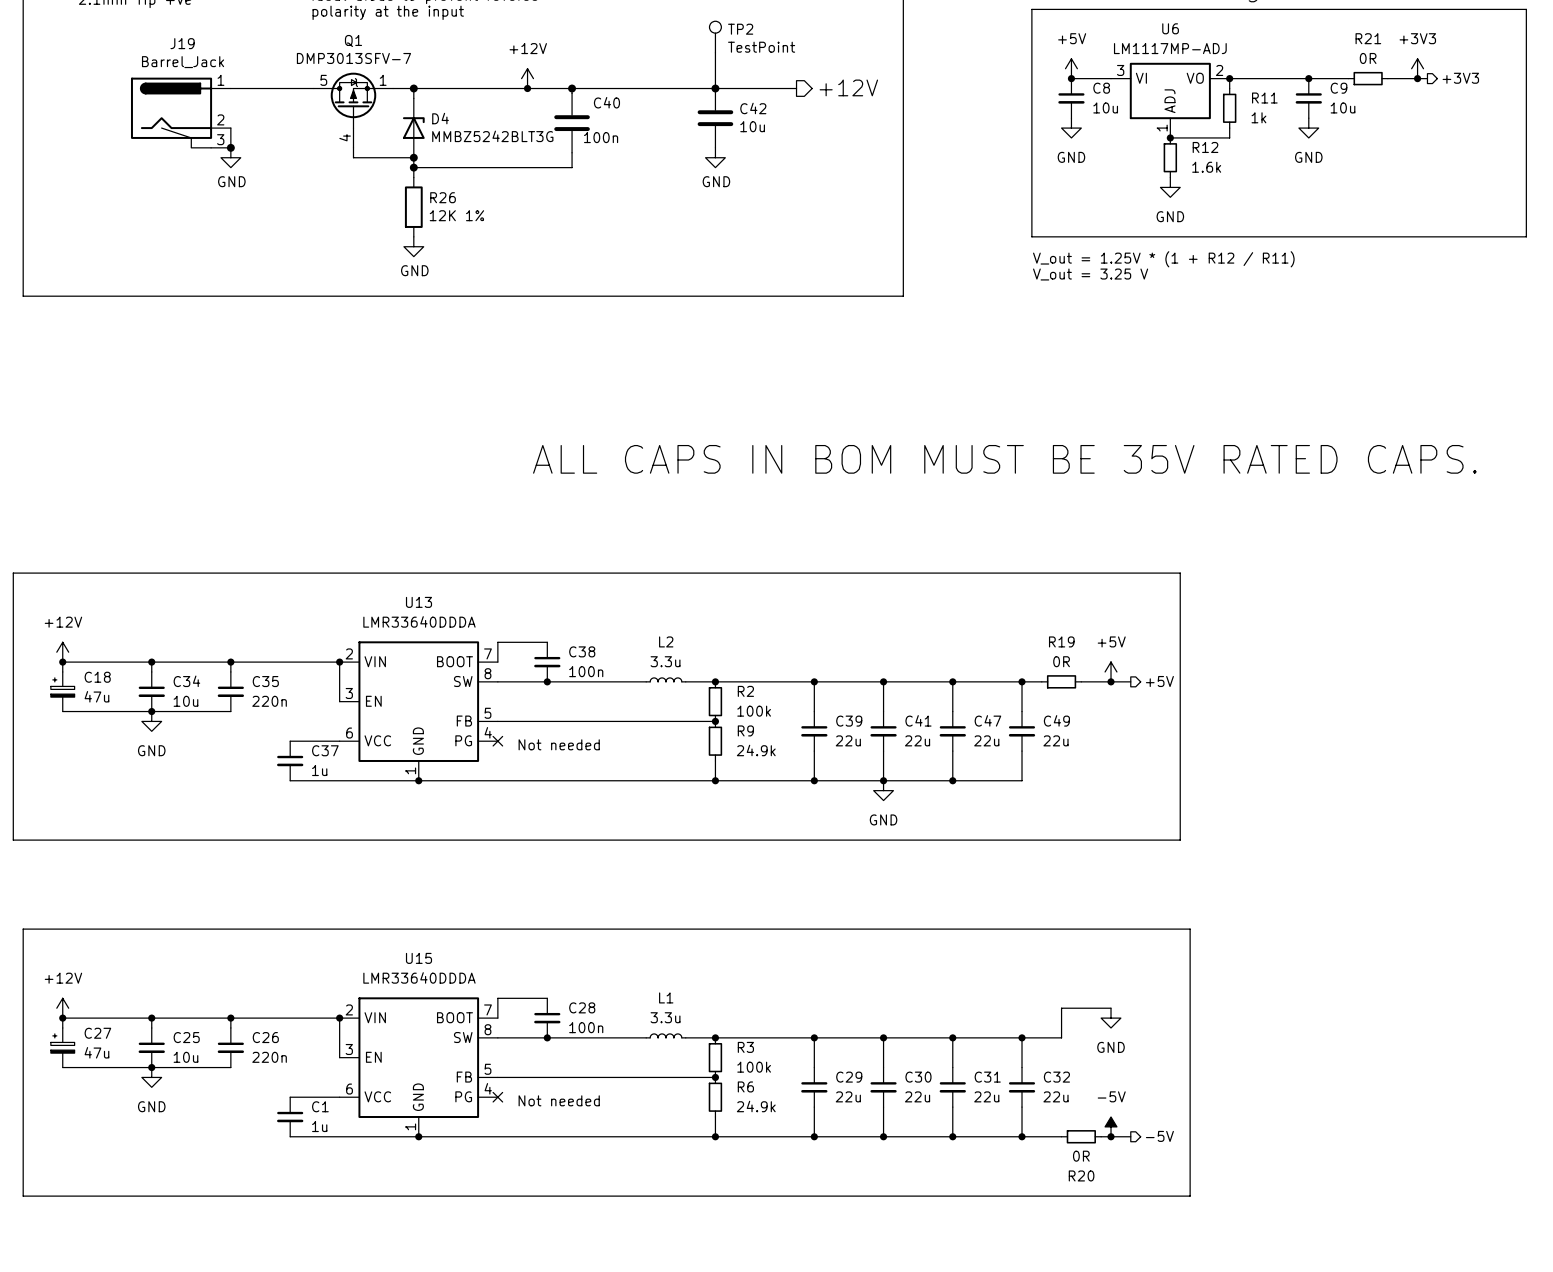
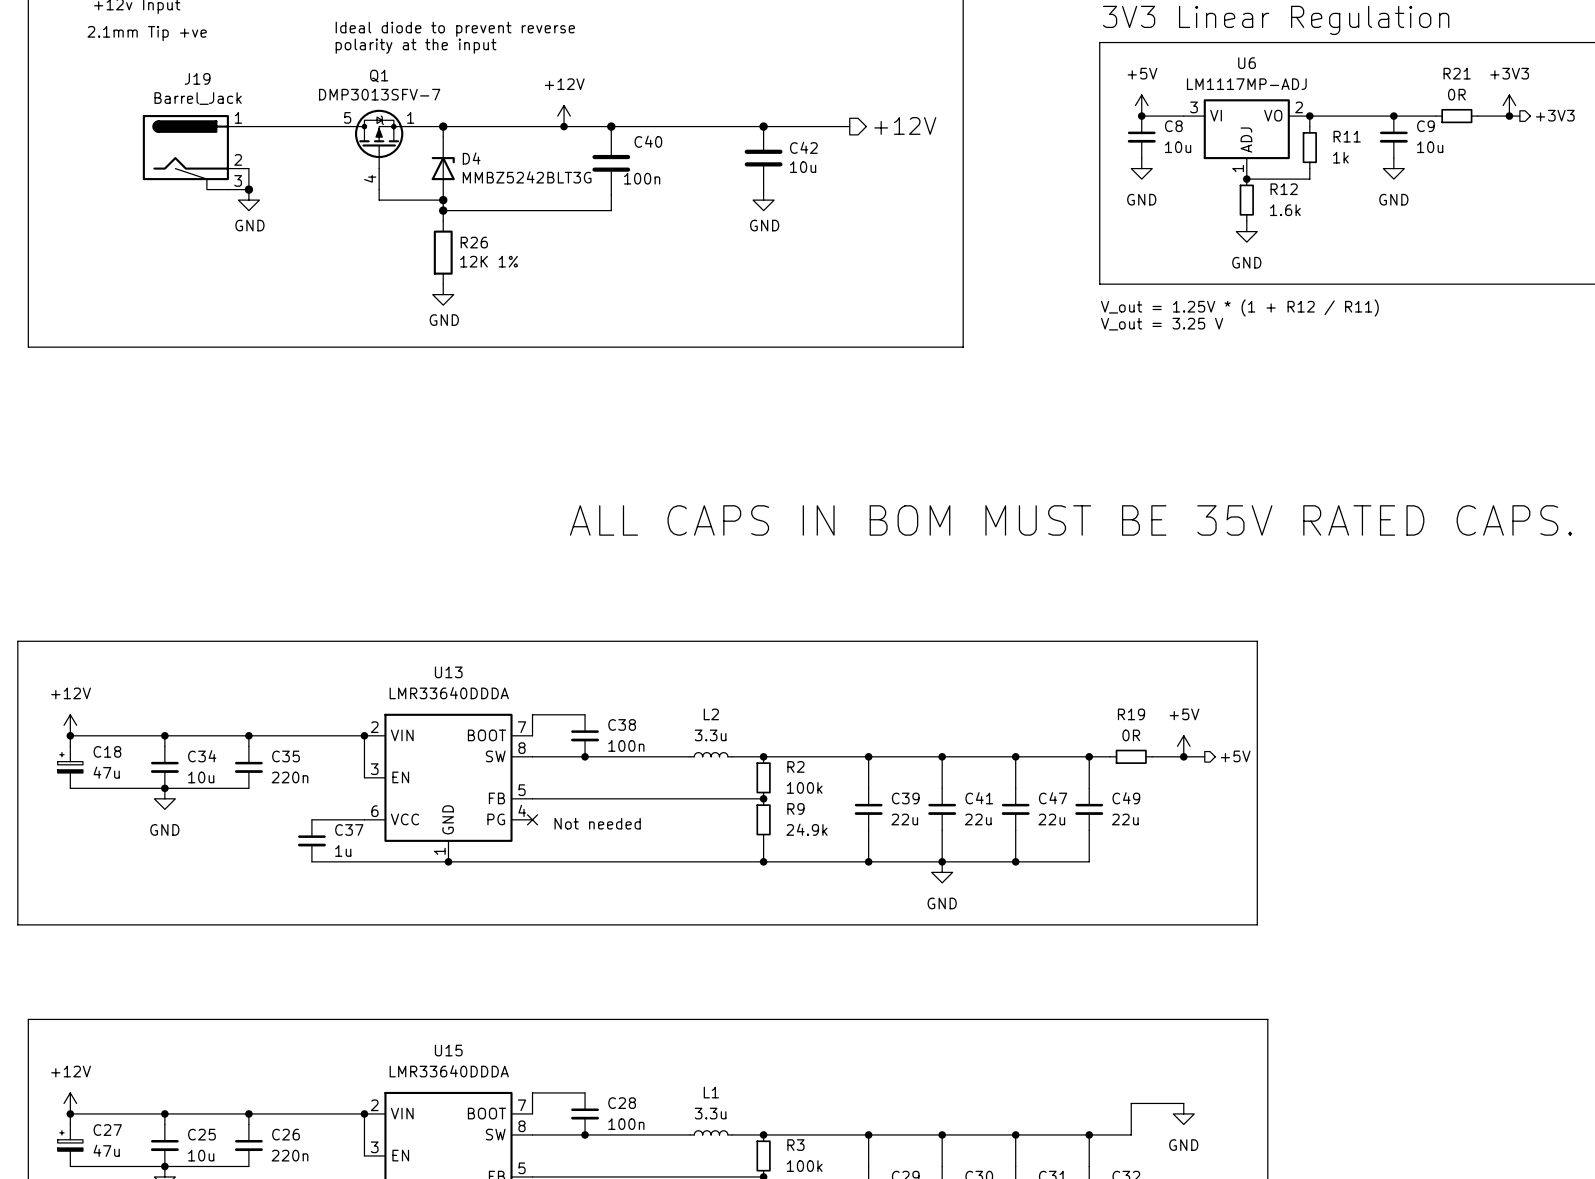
TP2: TestPoint (715, 37) -> none
wire: (715, 52) (715, 88) -> none

